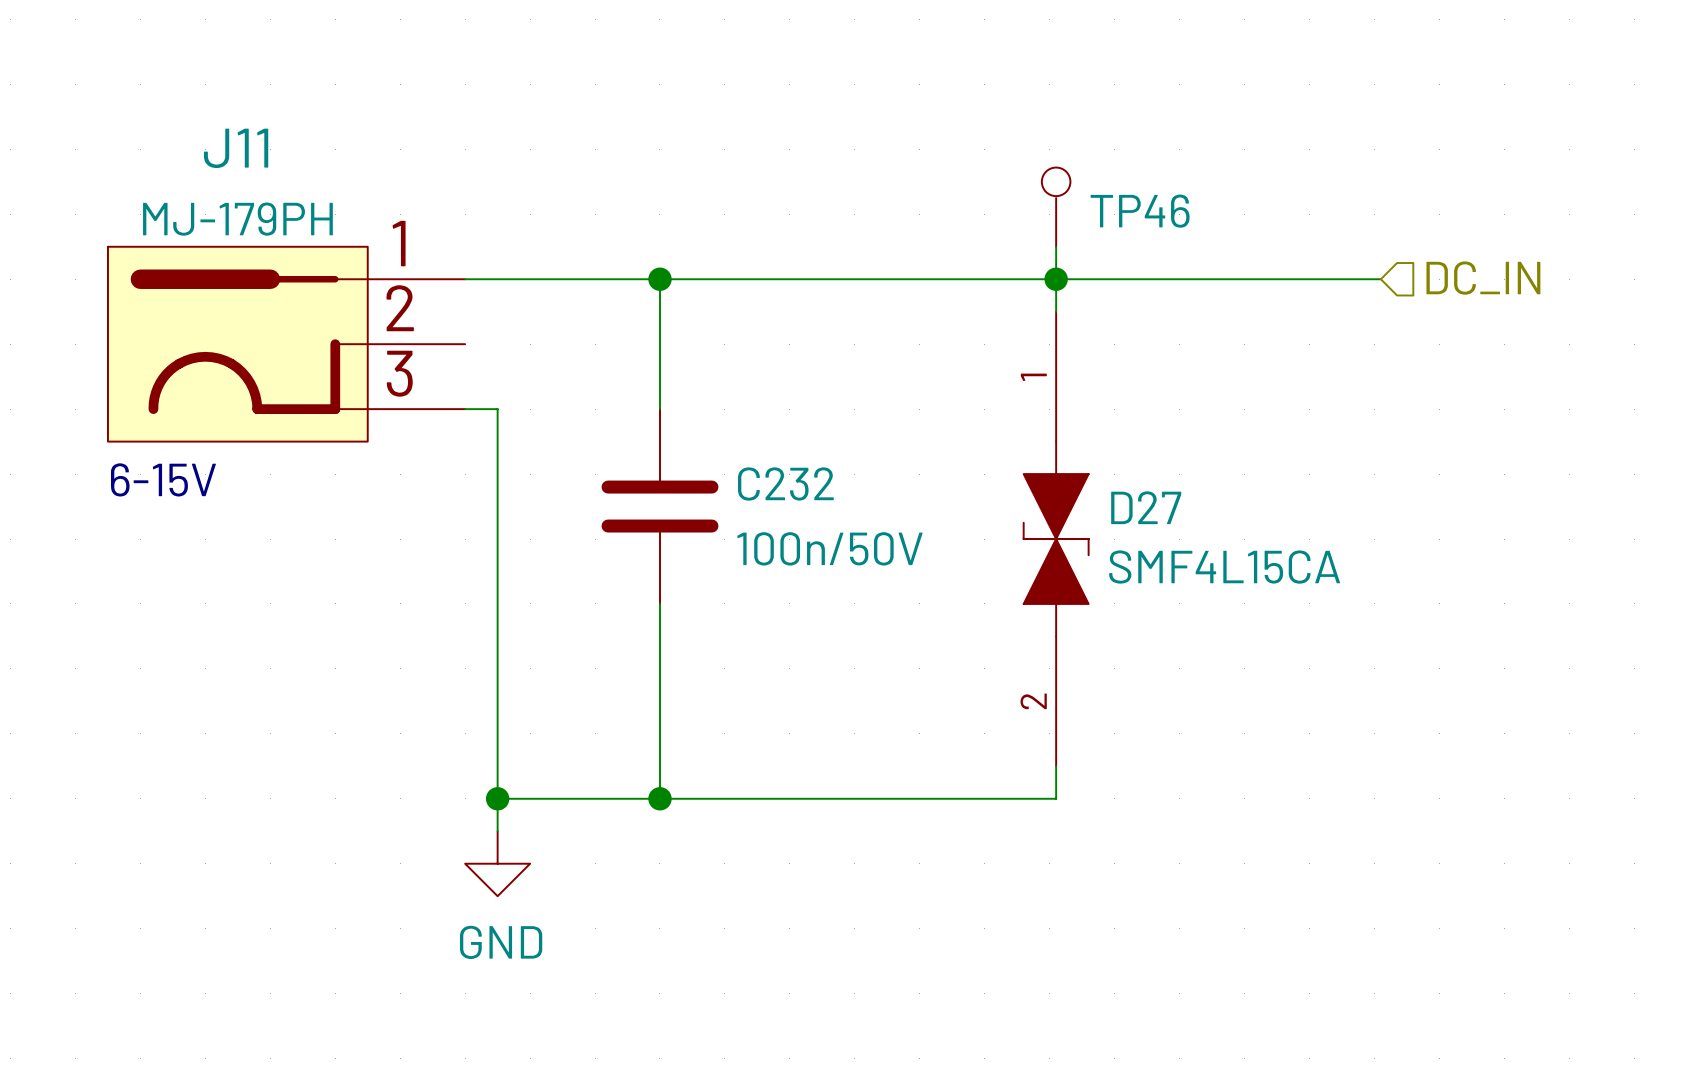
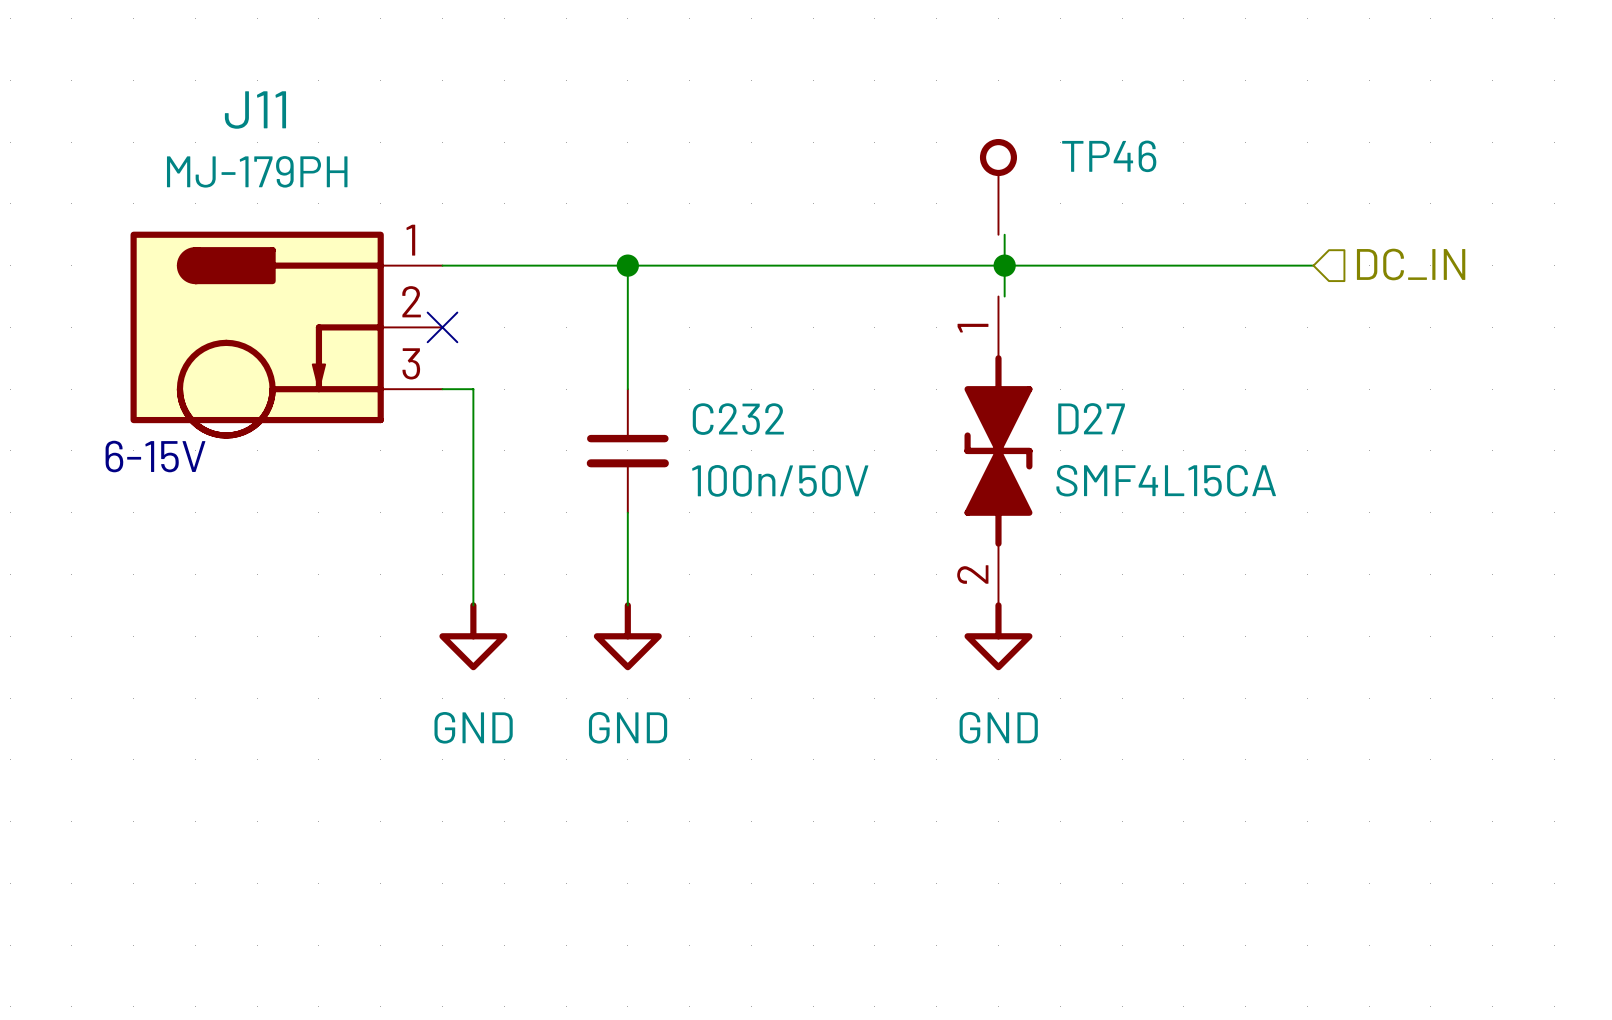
TP46 symbol: [1041, 167, 1071, 247] -> [979, 138, 1018, 235]
TP46 name position: TP46 (1140, 211) -> TP46 (1109, 156)
J11 symbol: [107, 246, 466, 442] -> [130, 231, 443, 439]
D27 symbol: [1023, 311, 1089, 767] -> [964, 296, 1033, 606]
no-connect mark: none -> (442, 327)
C232 symbol: [601, 409, 719, 604] -> [586, 389, 669, 513]
wire: (497, 636) (497, 831) -> none
wire: (659, 636) (659, 798) -> none
power symbol: none -> GND (473, 636)
power symbol: none -> GND (627, 636)
power symbol: none -> GND (998, 636)
wire: (1056, 766) (1056, 798) (497, 798) -> none
junction: (497, 798) -> none
junction: (659, 798) -> none
power symbol: GND (497, 863) -> none

